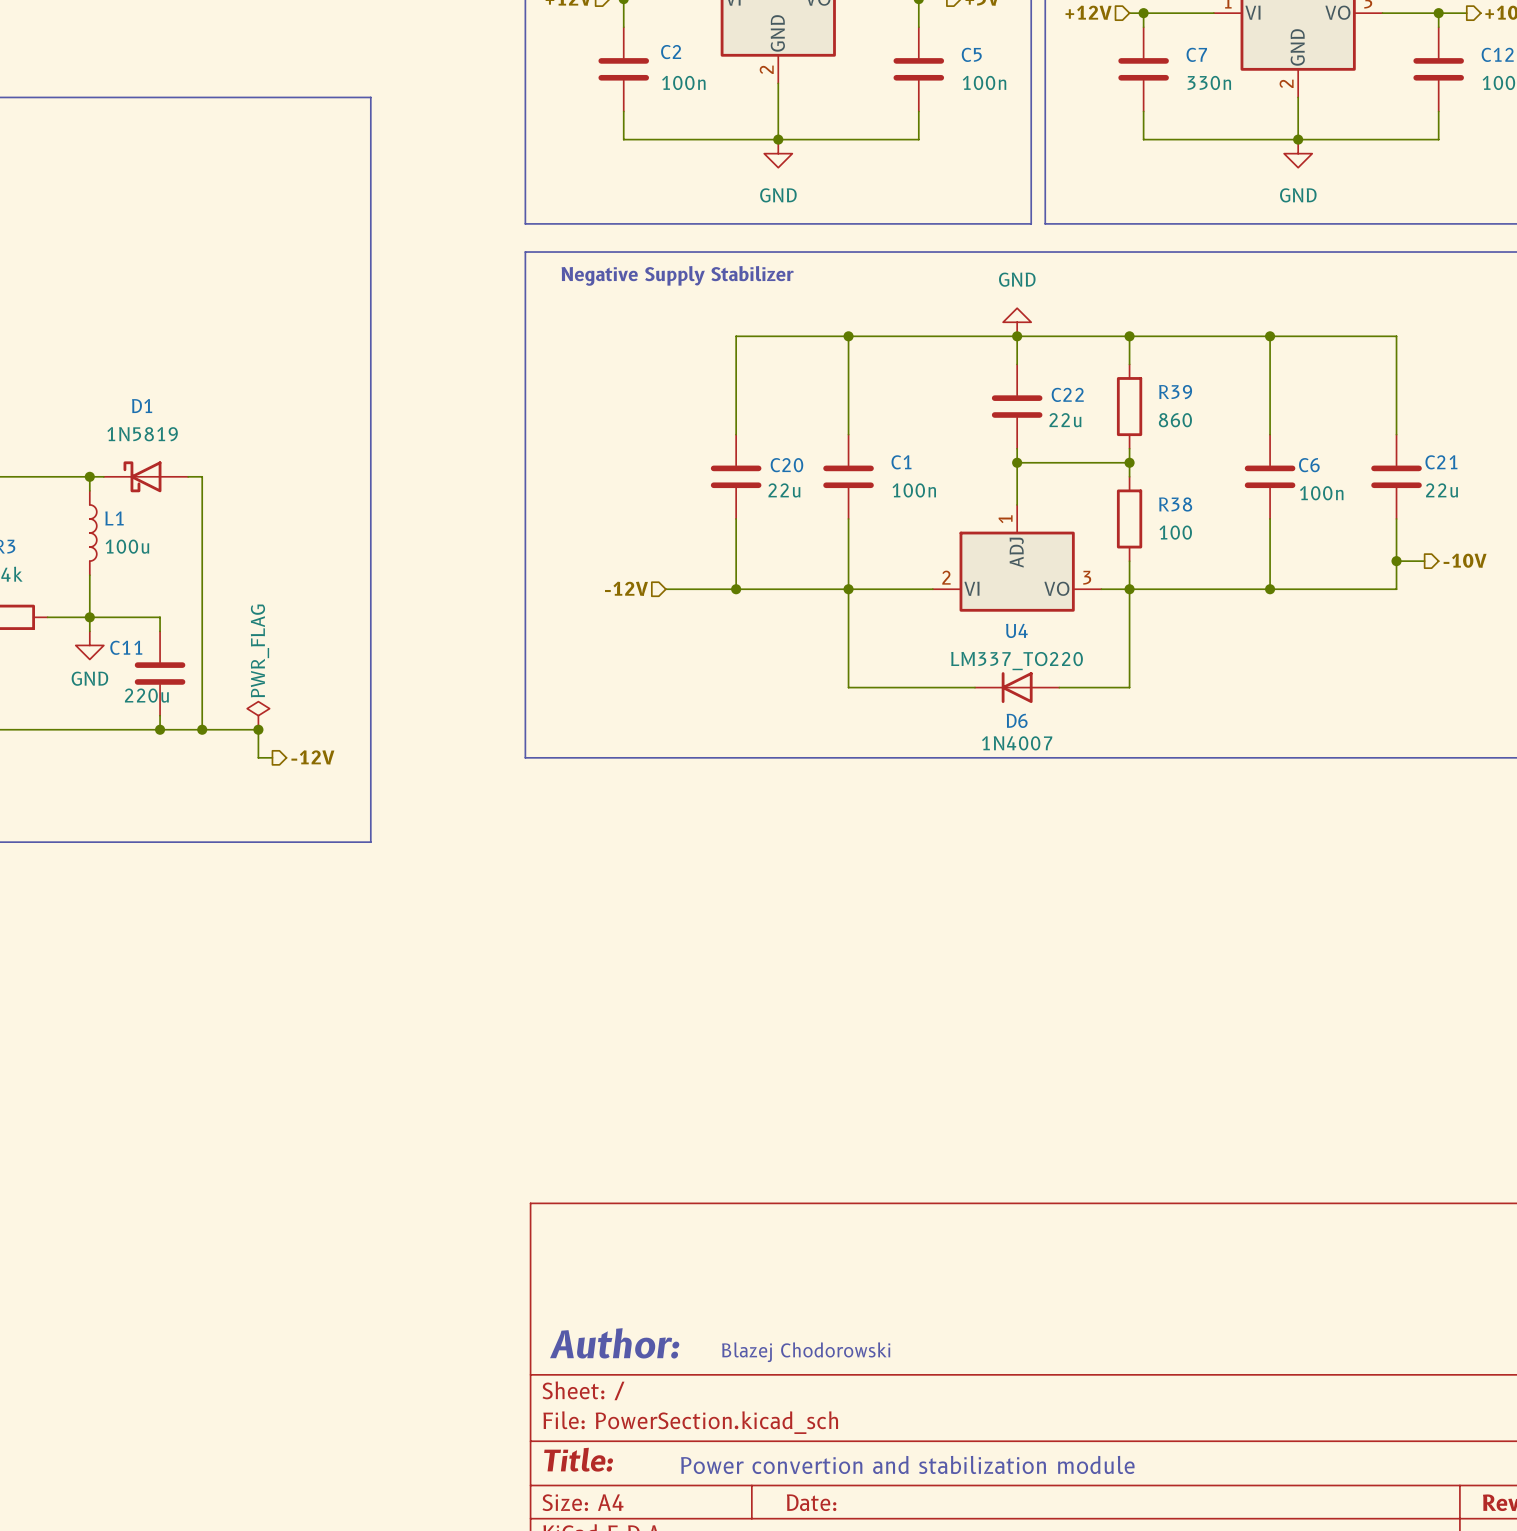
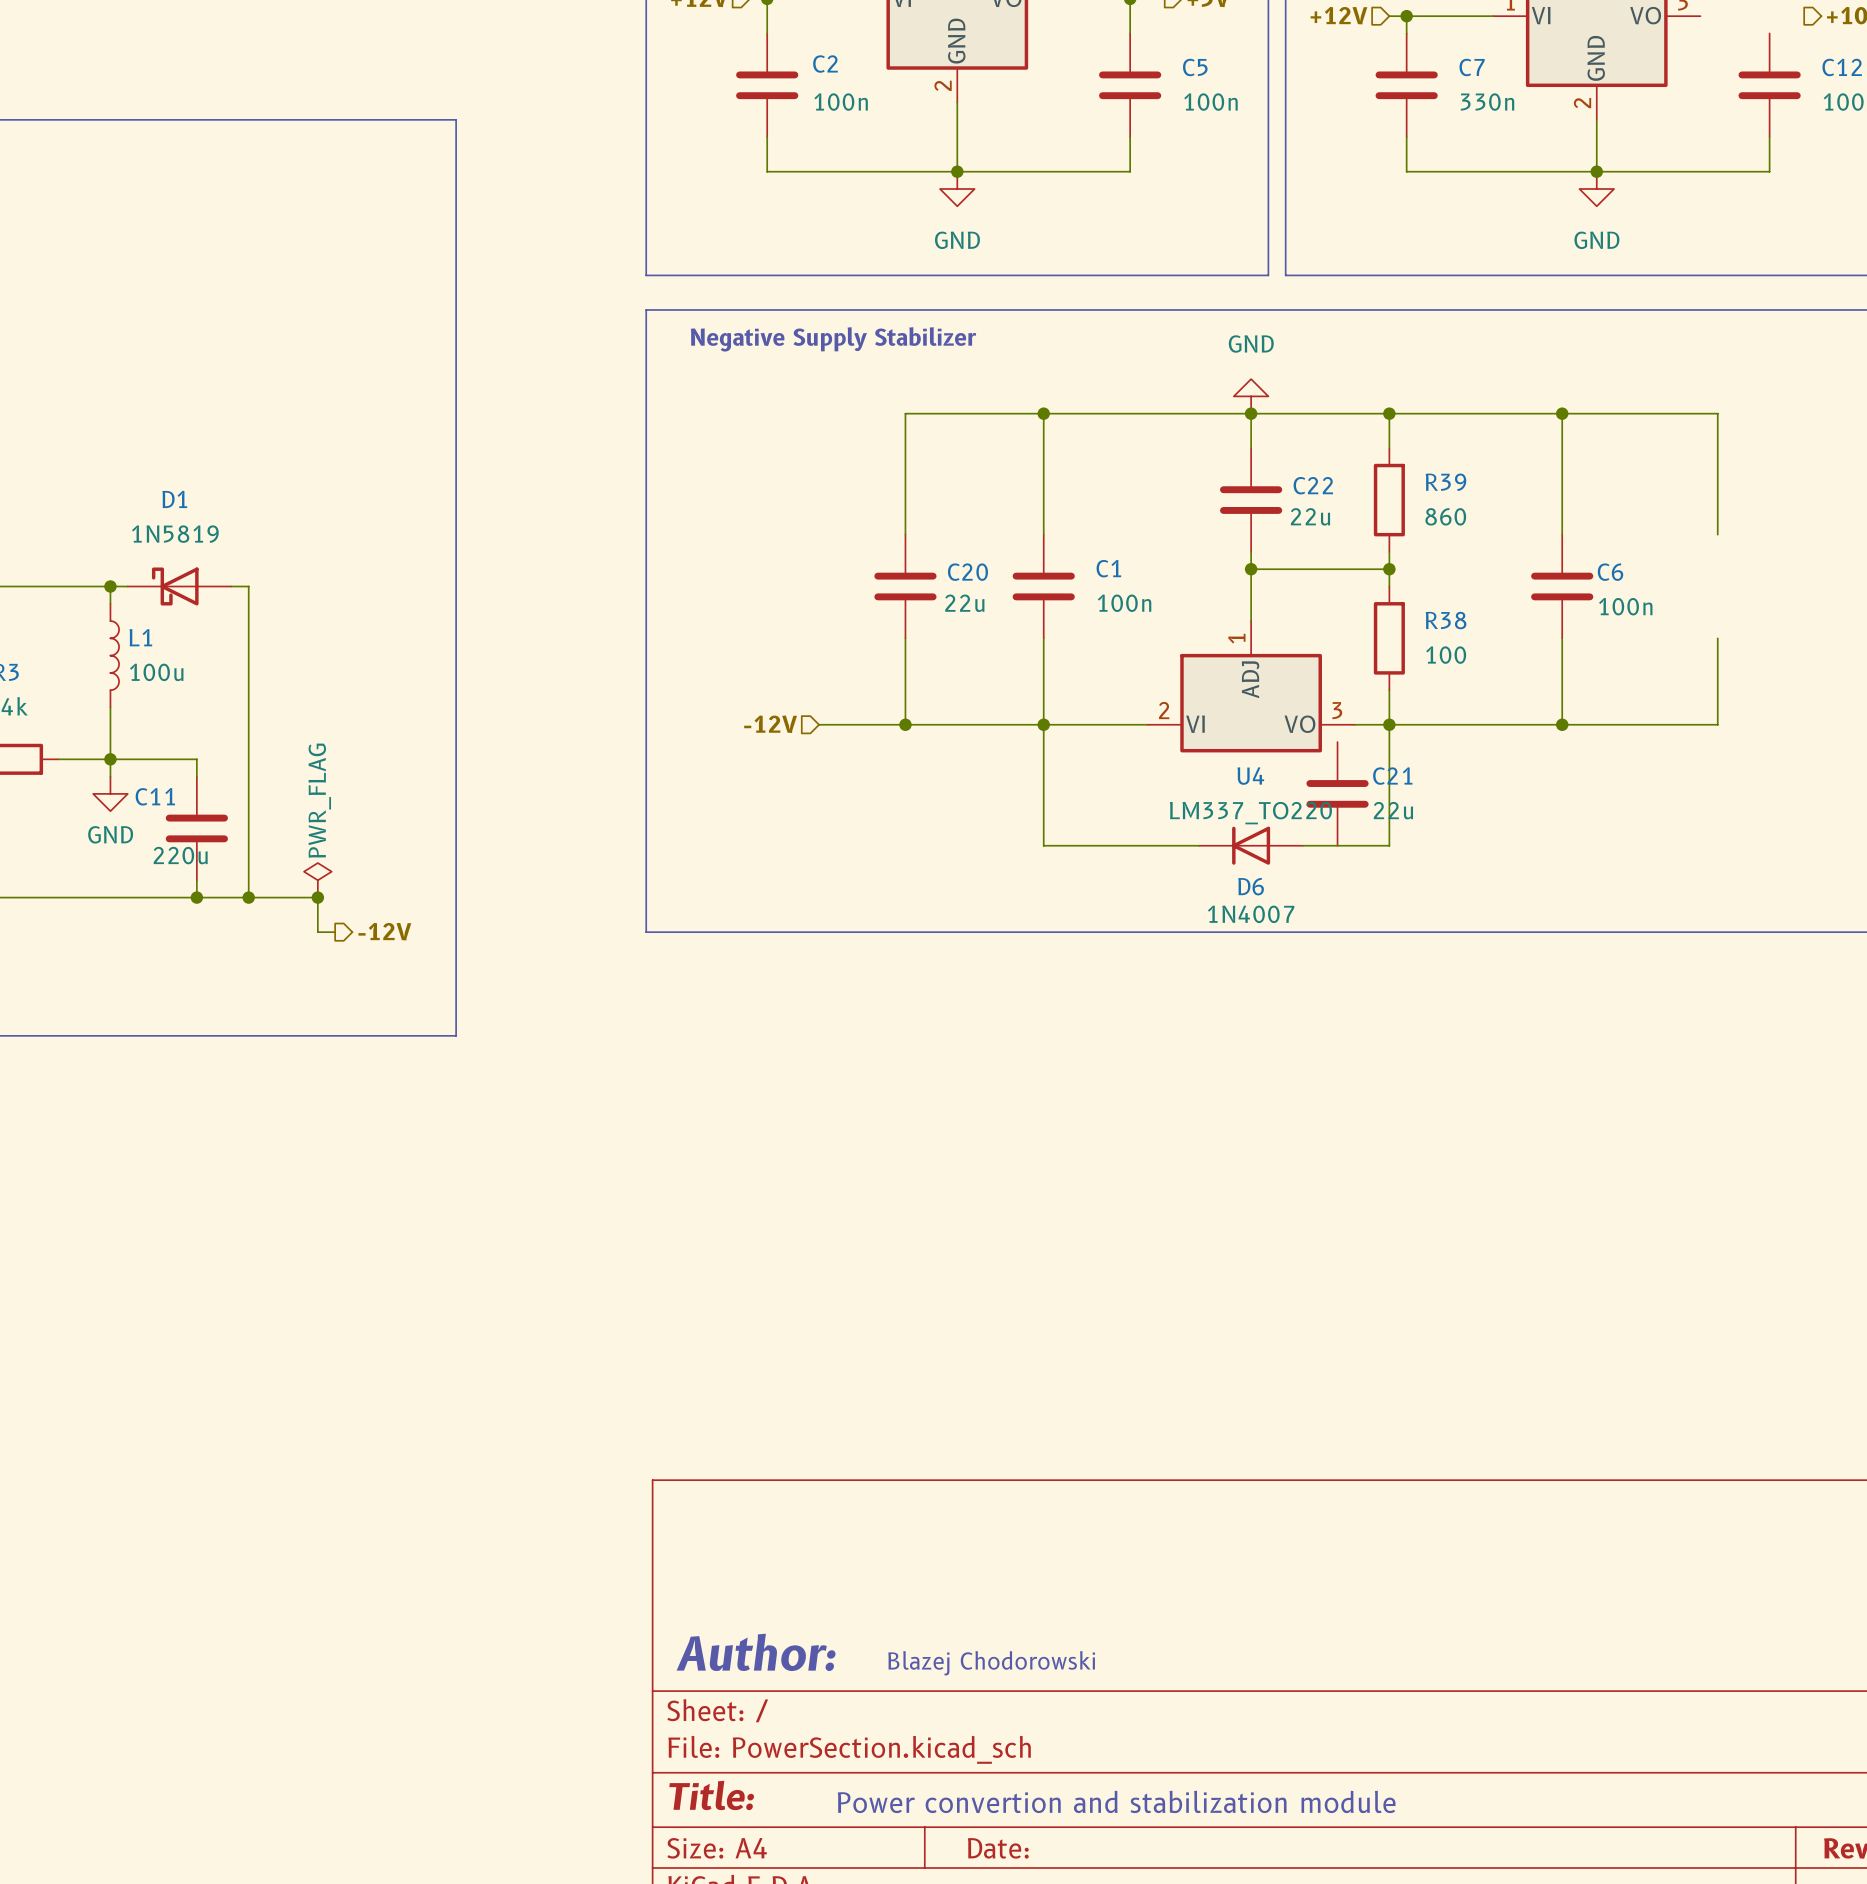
wire: (1382, 13) (1466, 13) -> none
wire: (1438, 13) (1438, 27) -> none
junction: (1438, 13) -> none
C21 position: (1396, 476) -> (1337, 793)
hierarchical label: -10V (1465, 560) -> none
wire: (1396, 561) (1424, 561) -> none
junction: (1396, 561) -> none

